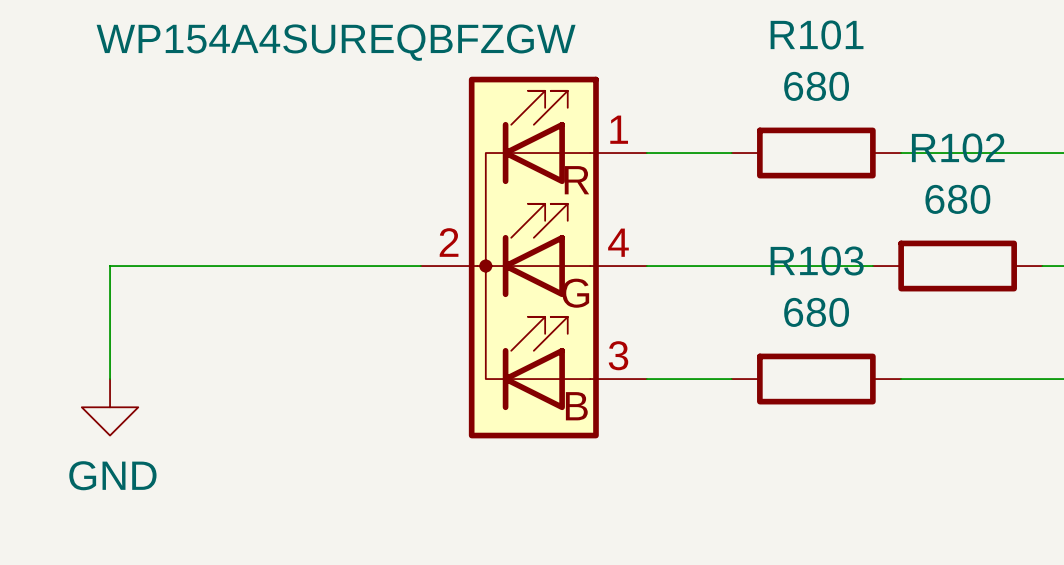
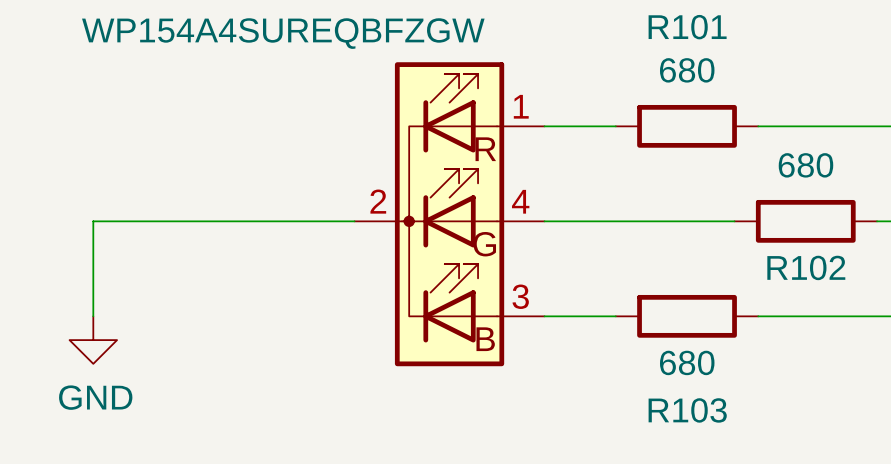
R102 name position: R102 (958, 147) -> R102 (806, 267)
R103 name position: R103 (817, 261) -> R103 (687, 410)
R103 value position: 680 (816, 312) -> 680 (687, 362)

